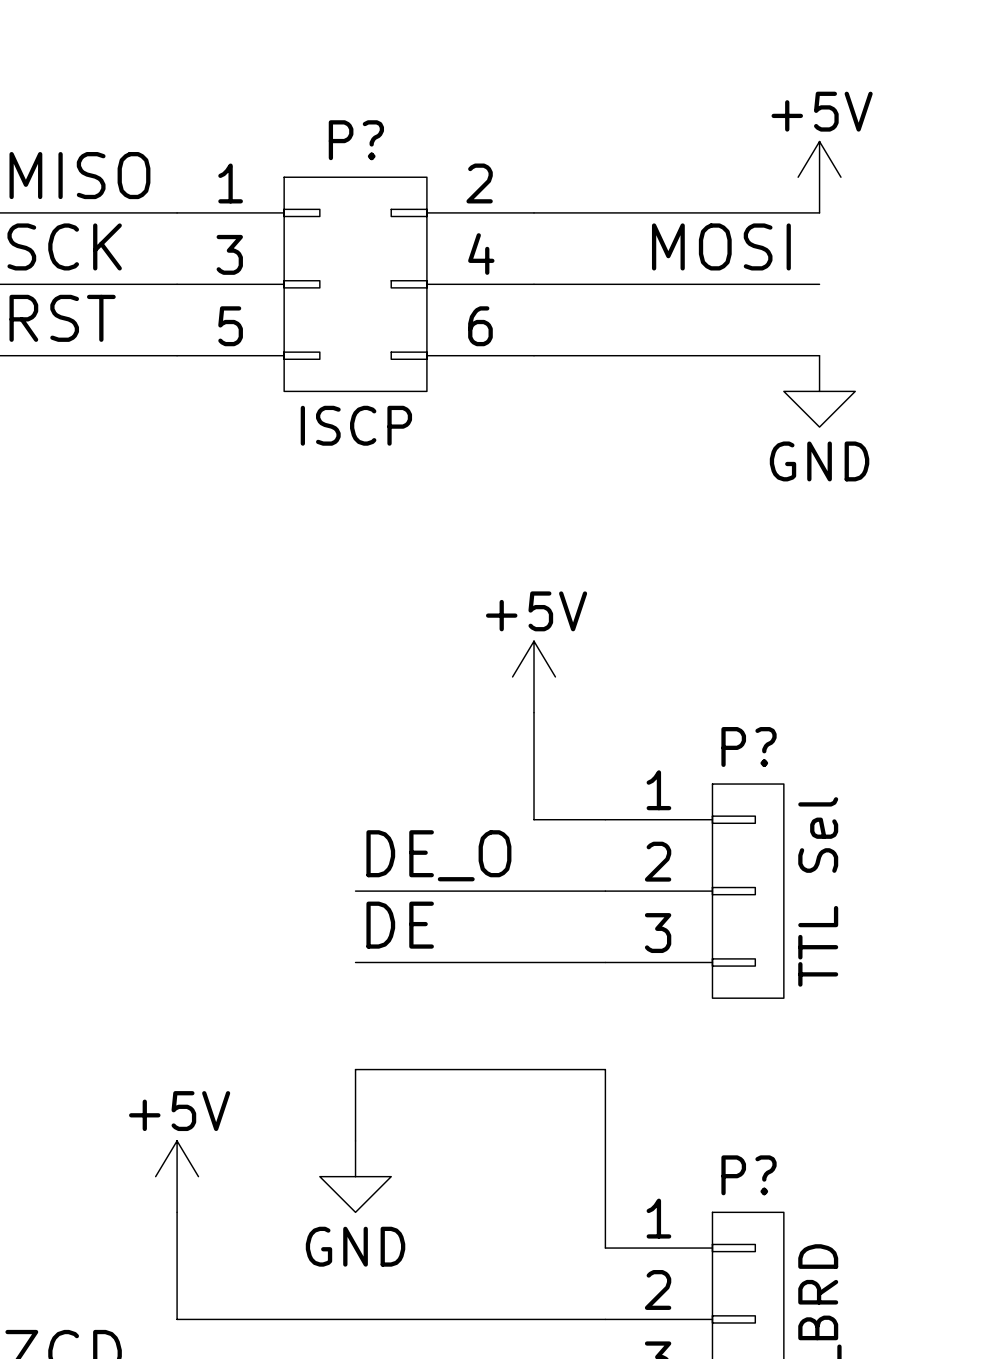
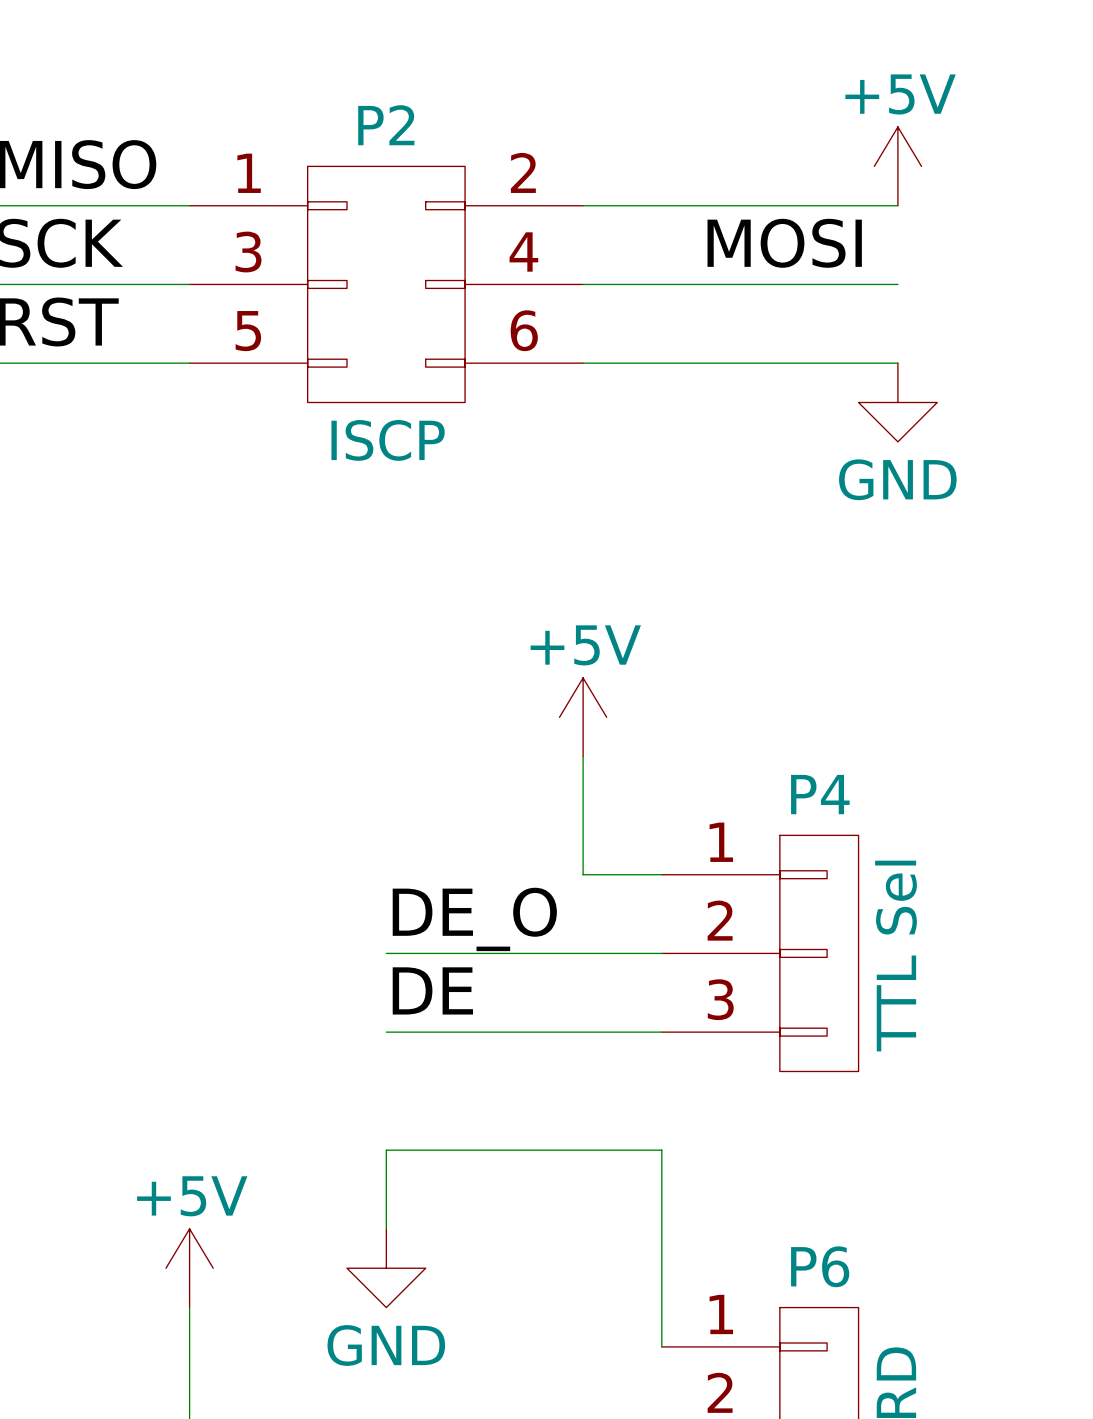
P? name: P? (356, 140) -> P2 (386, 125)
P? name: P? (749, 746) -> P4 (820, 794)
P? name: P? (749, 1175) -> P6 (820, 1266)

